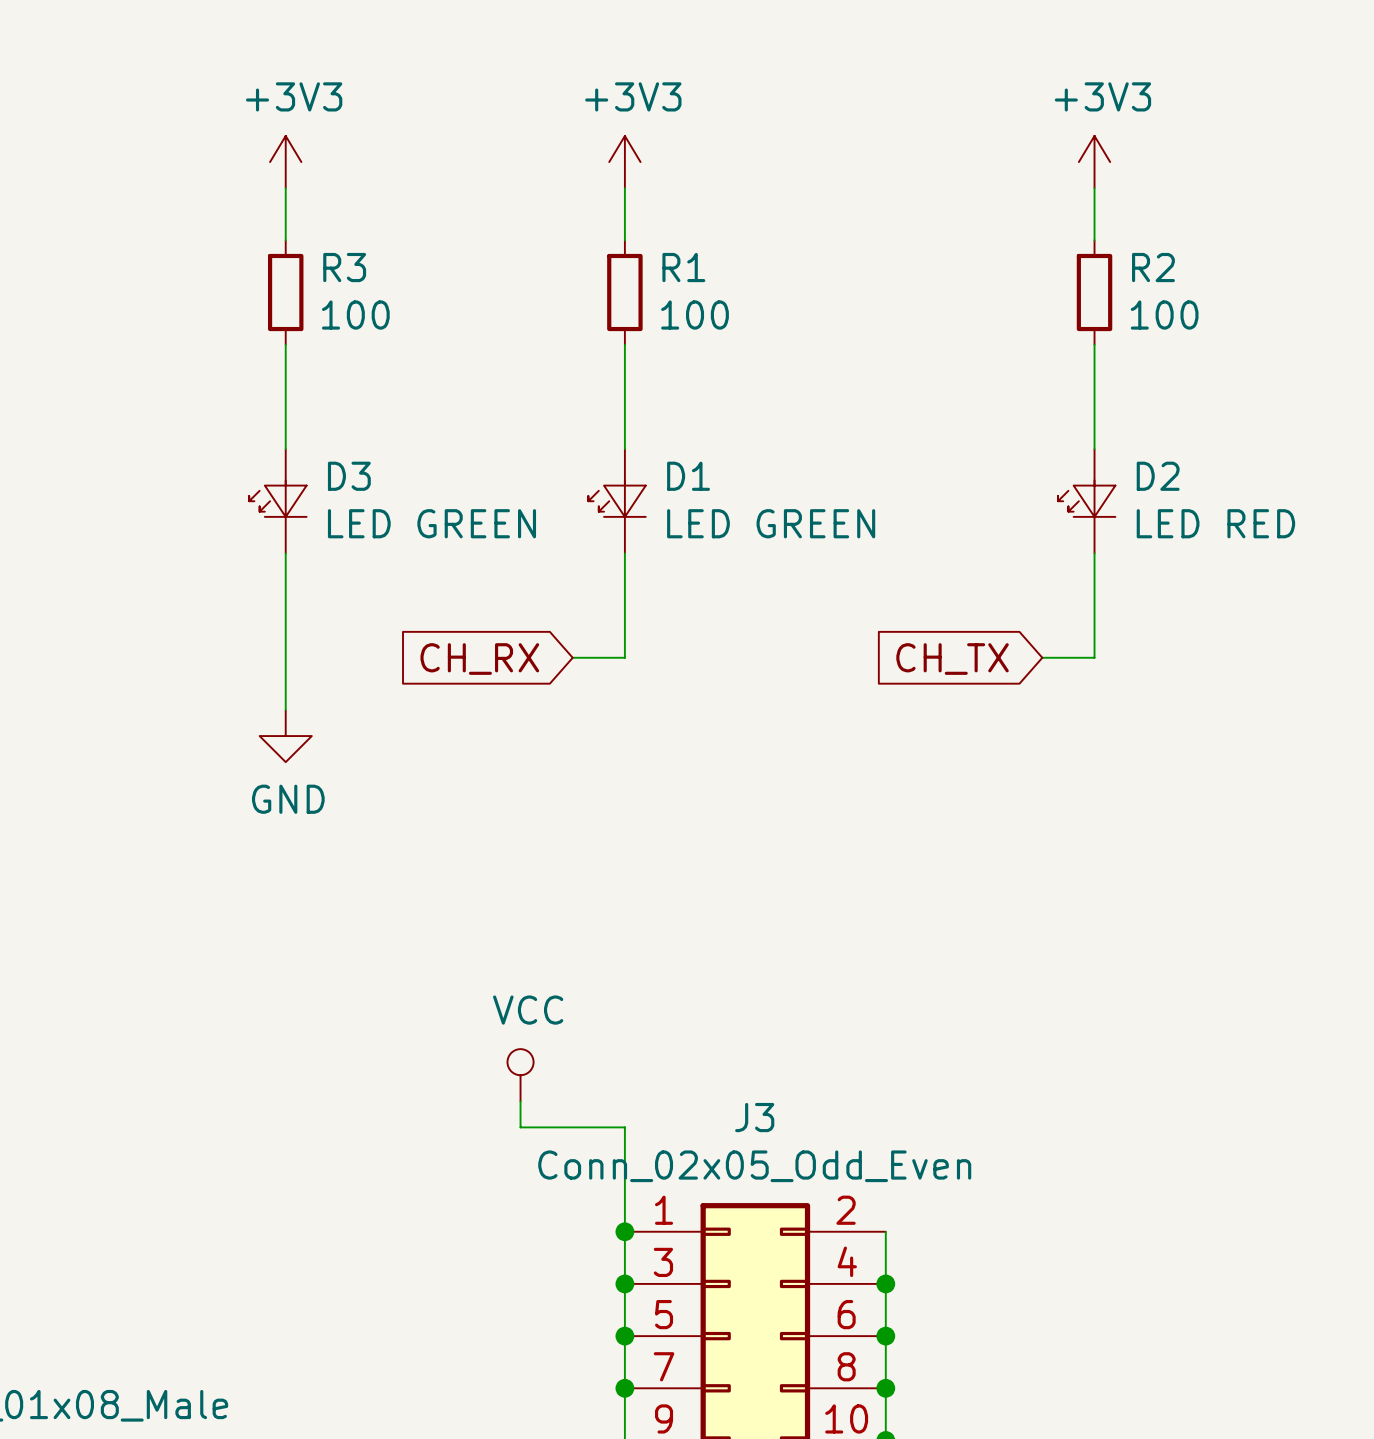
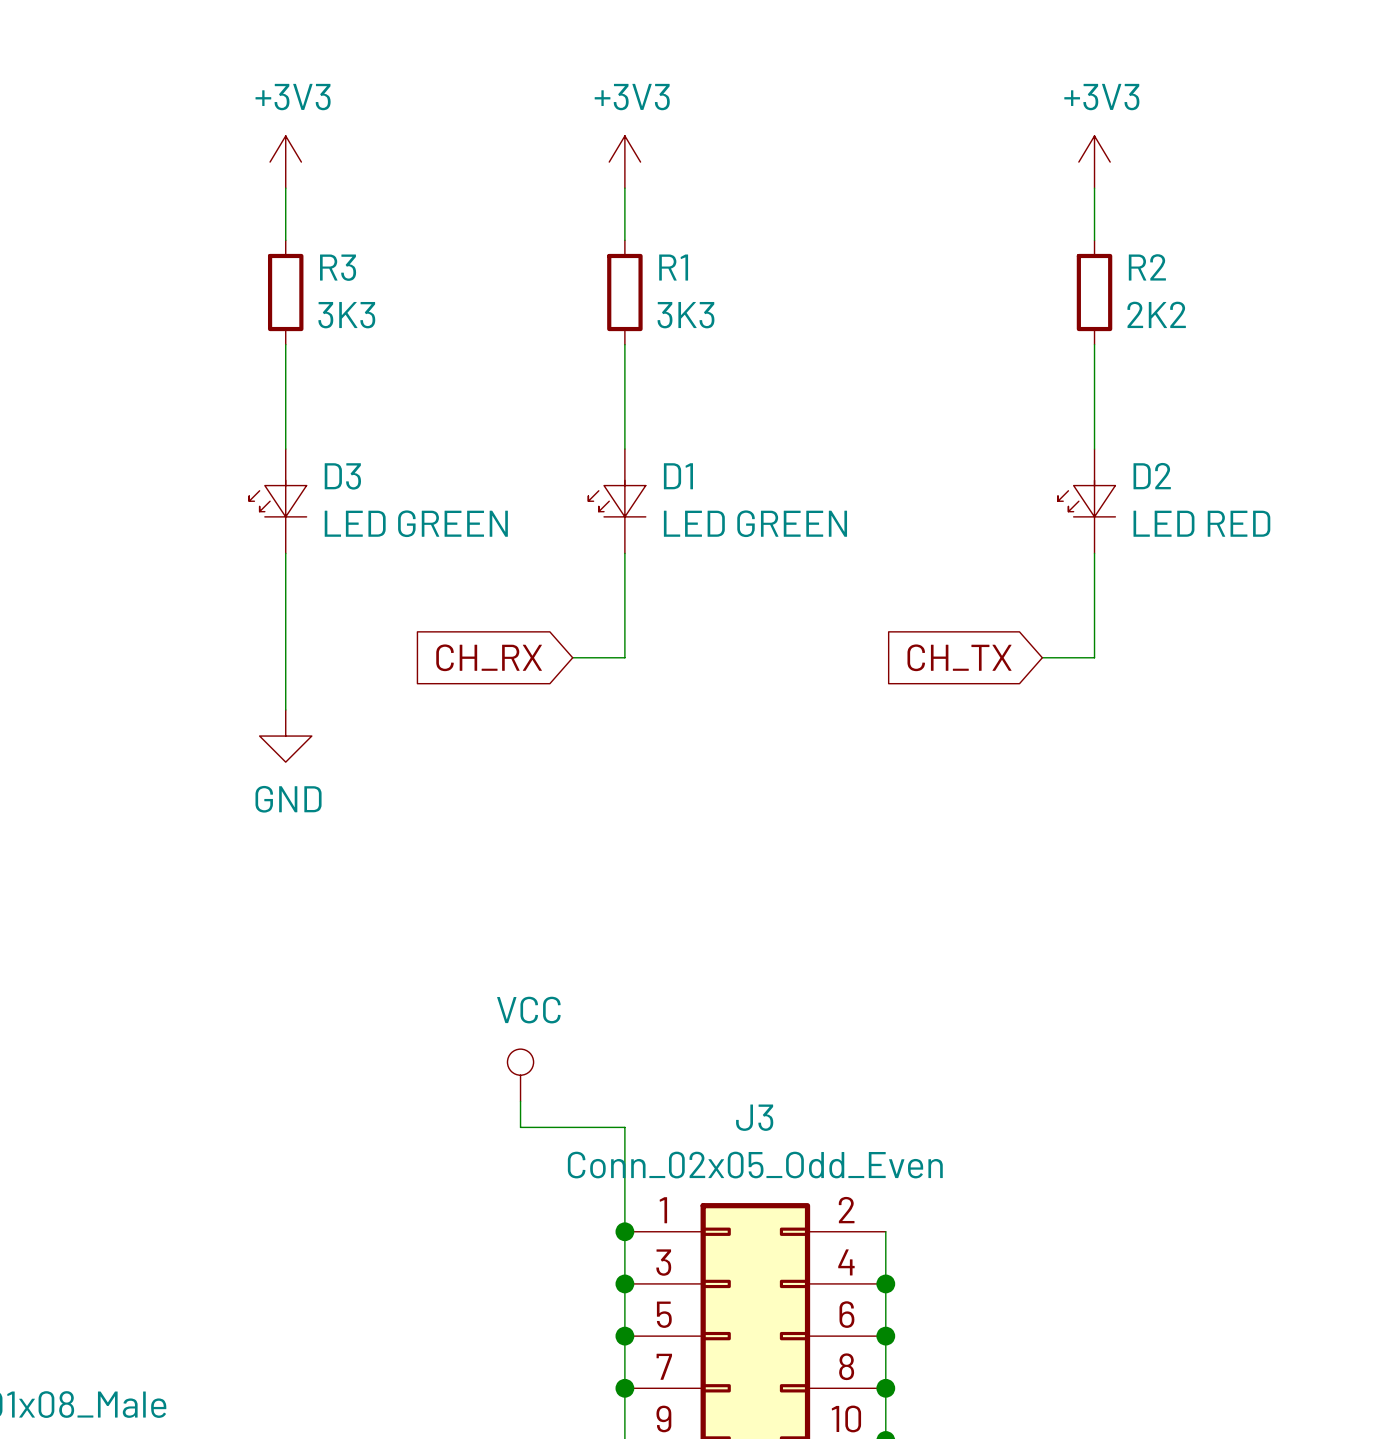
R3 value: 100 (355, 315) -> 3K3 (346, 315)
R1 value: 100 (695, 315) -> 3K3 (685, 315)
R2 value: 100 (1164, 315) -> 2K2 (1156, 314)

